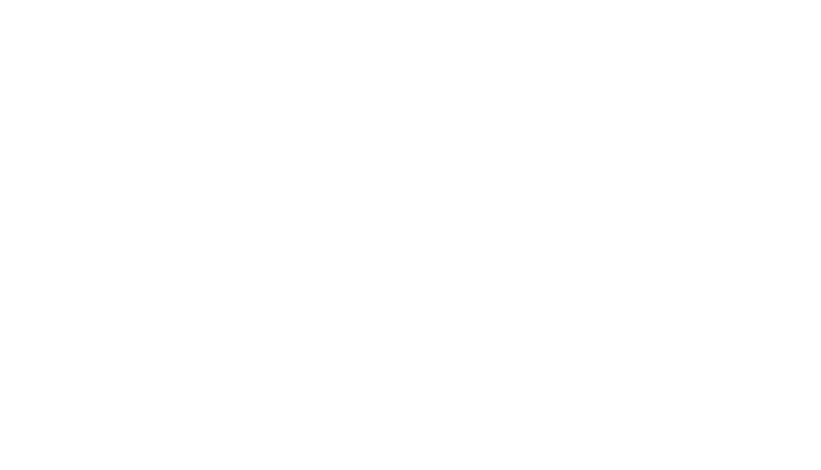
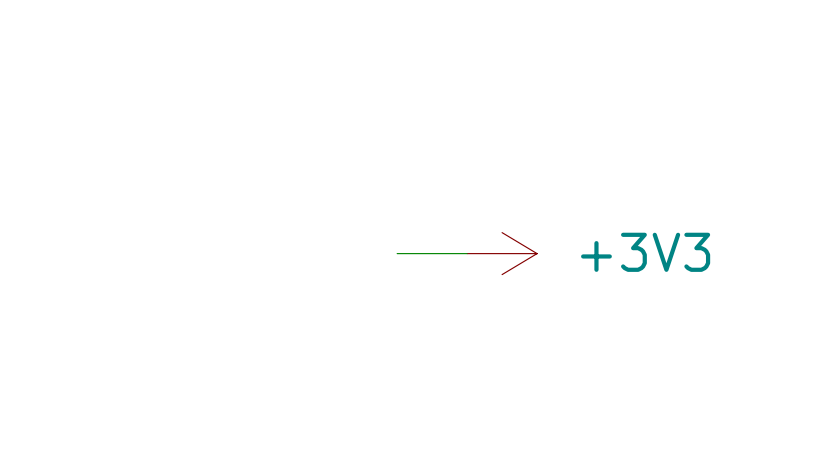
wire: none -> (397, 253) (467, 253)
power symbol: none -> +3V3 (502, 253)

